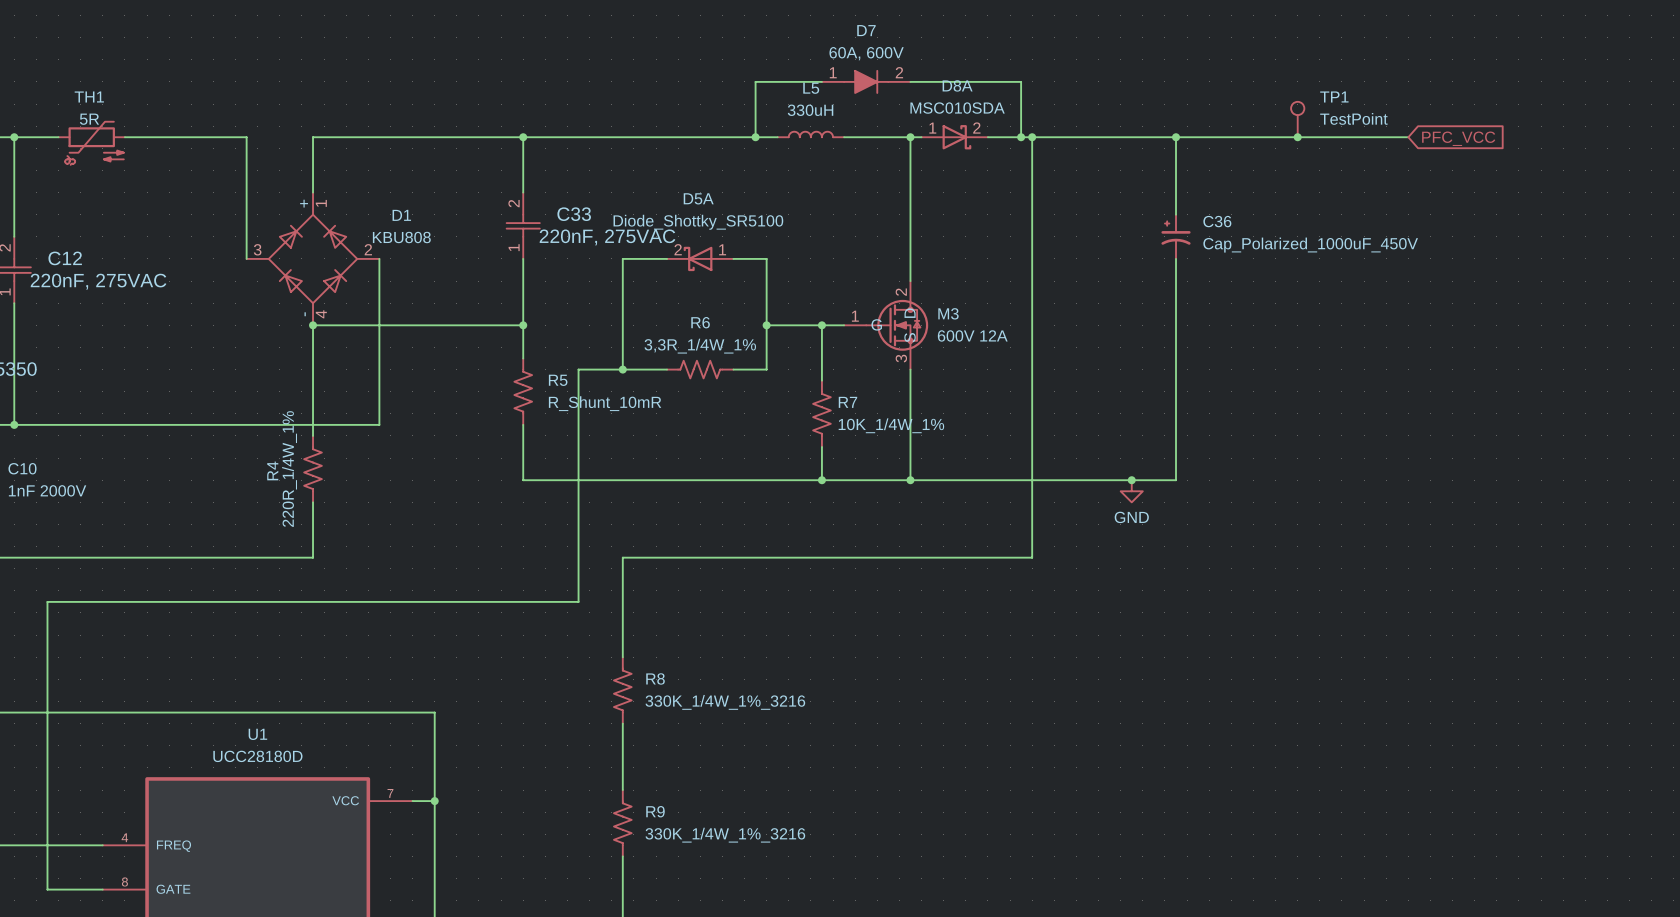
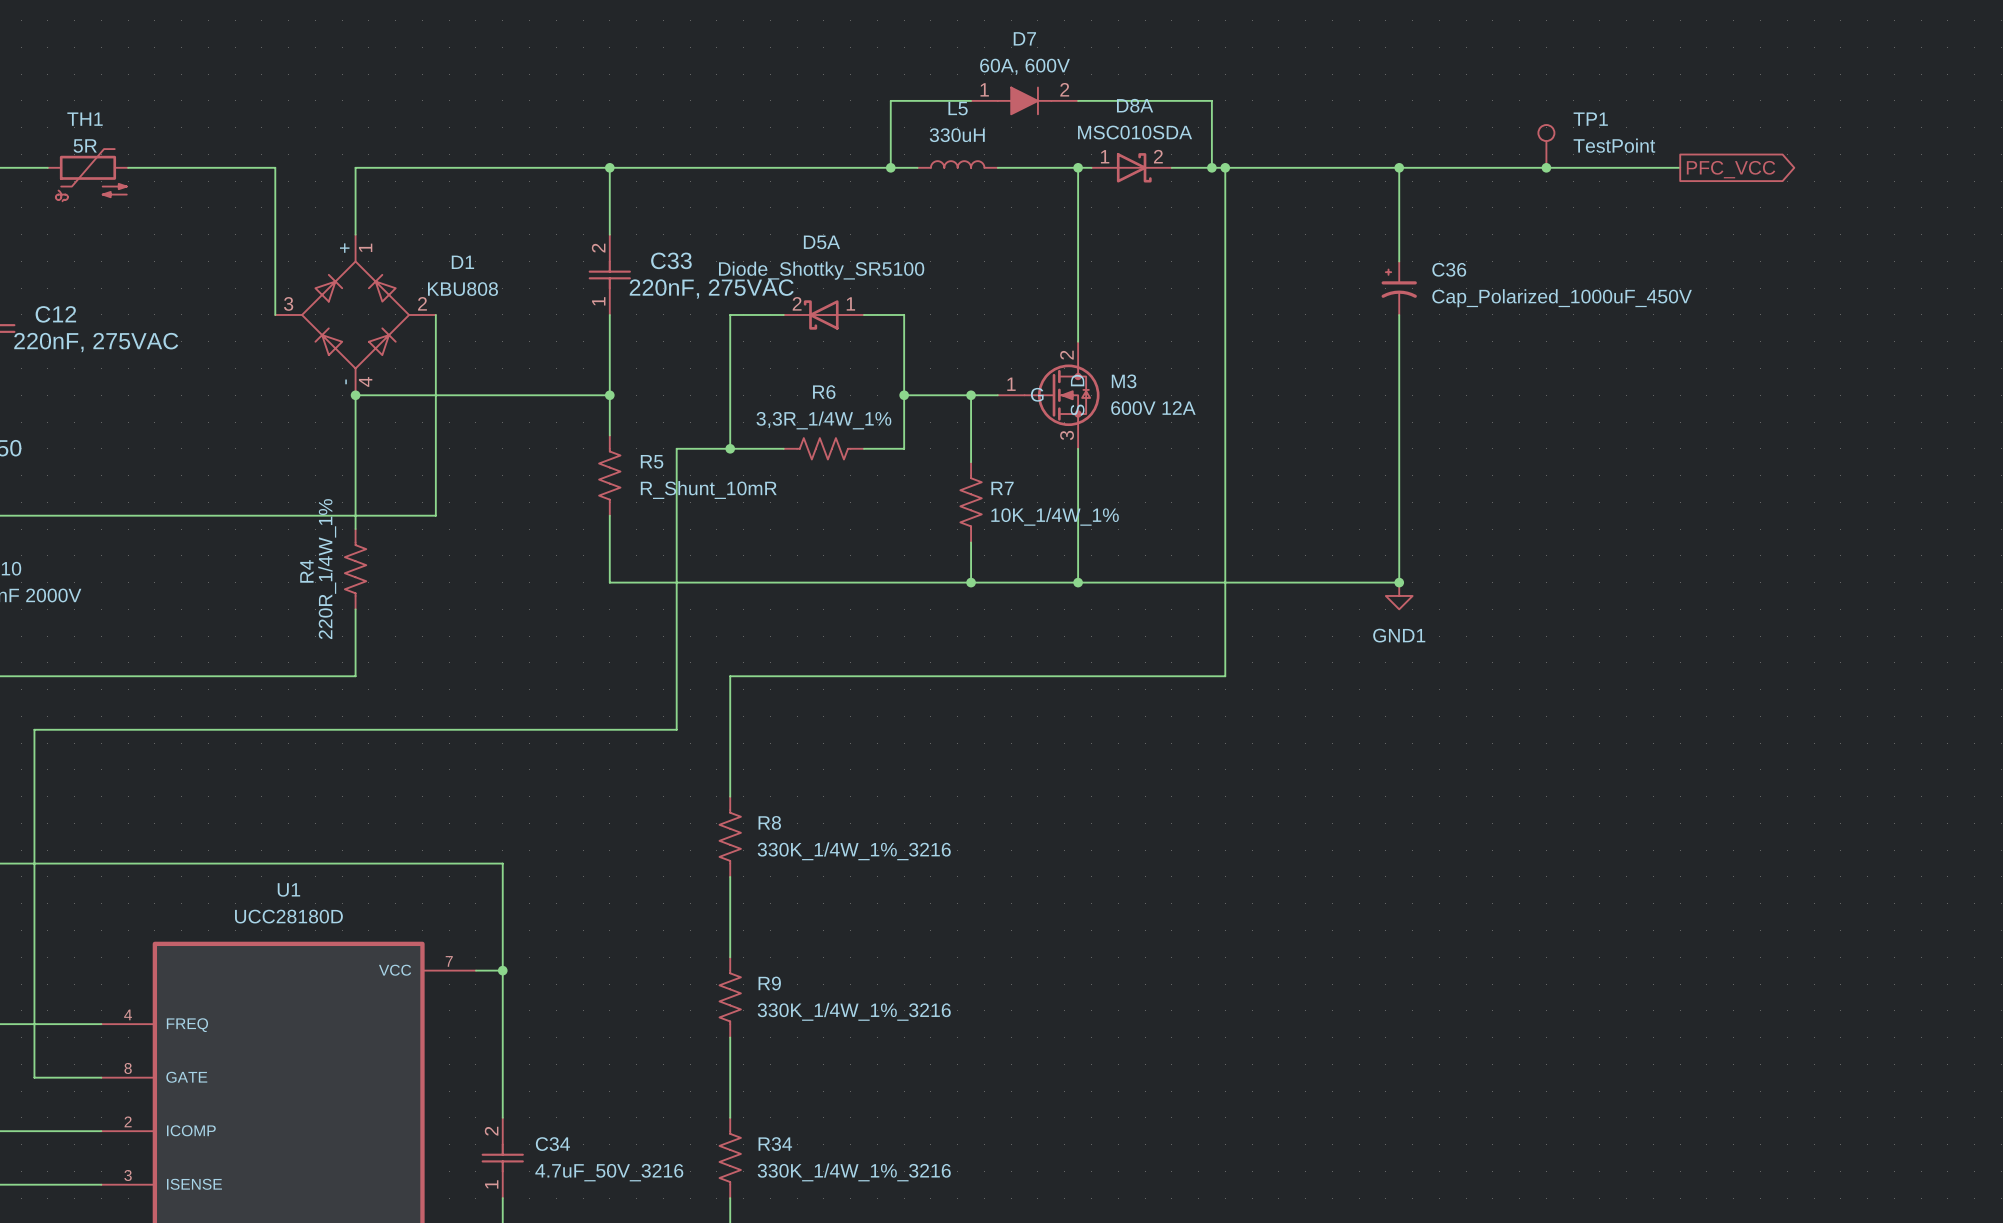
global label shape: input (1458, 138) -> output (1731, 169)
junction position: (1131, 480) -> (1399, 582)
power symbol: GND (1131, 491) -> none
power symbol: none -> GND1 (1399, 595)

